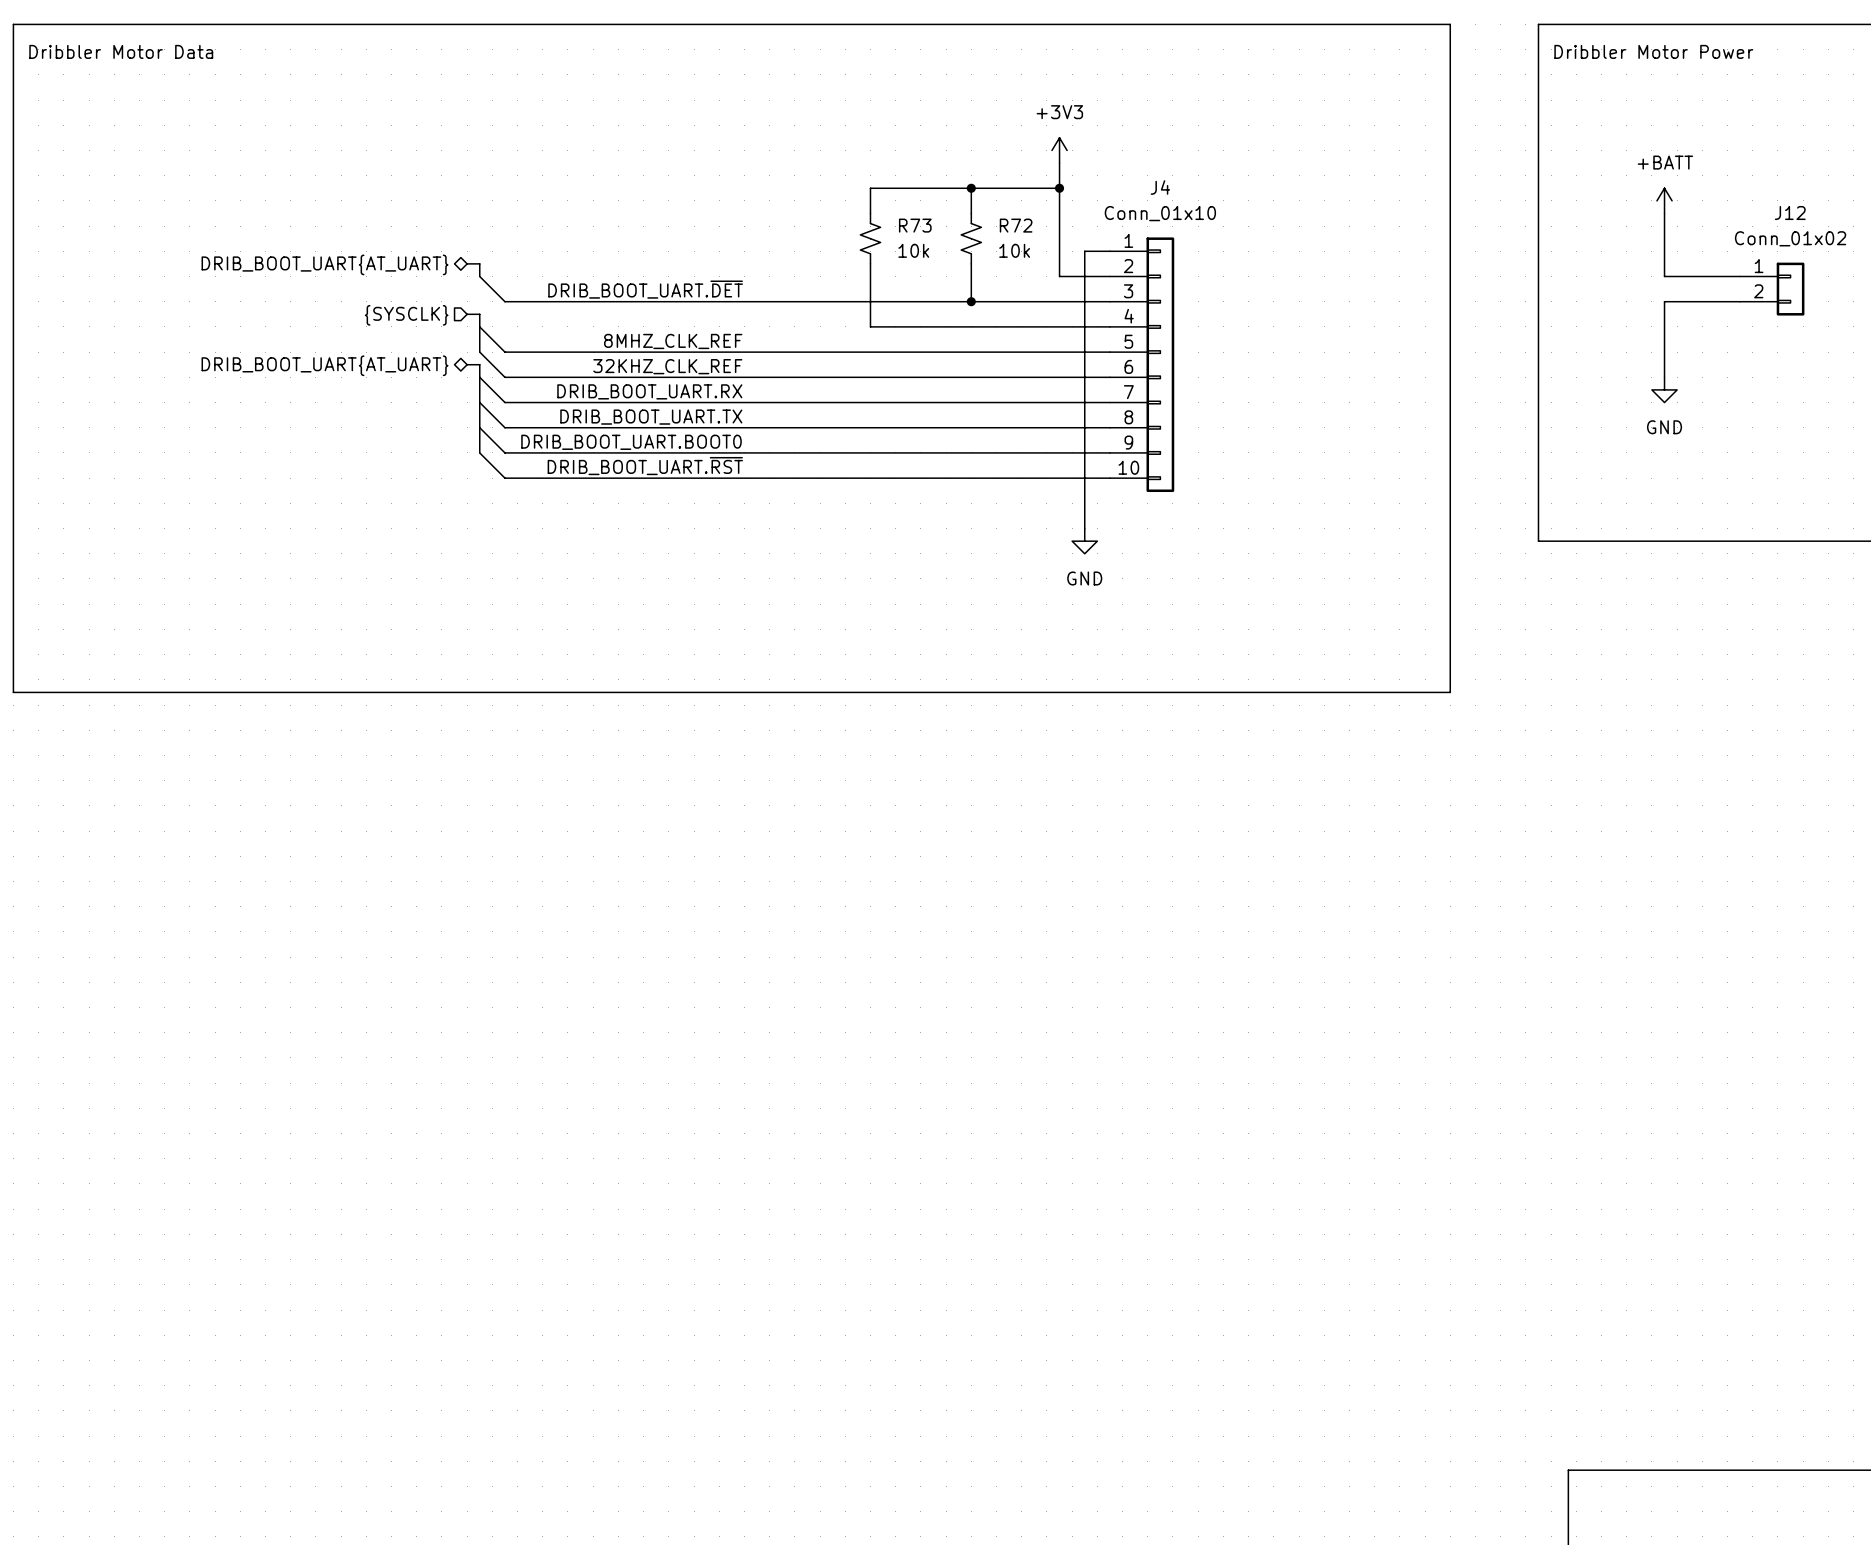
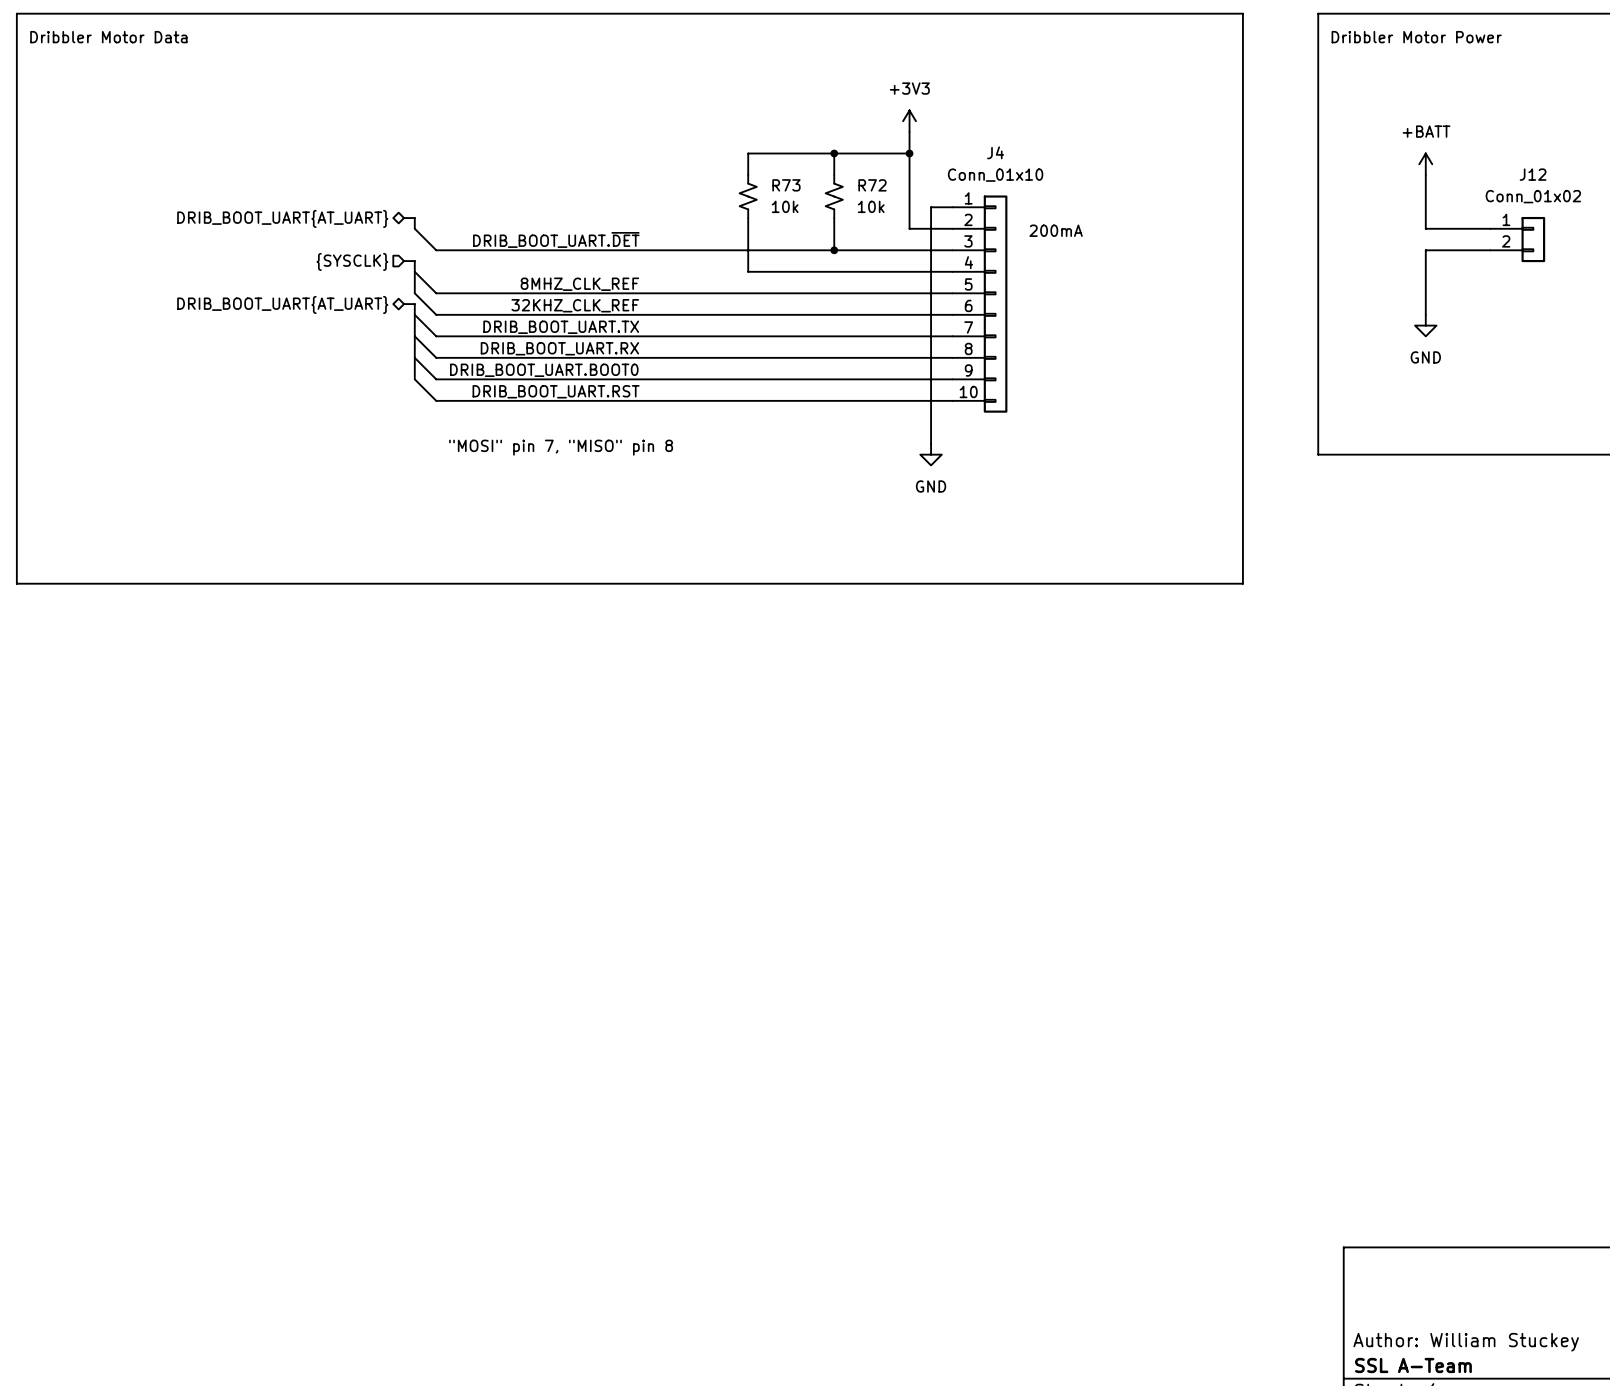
text: none -> 200mA (1056, 230)
label: DRIB_BOOT_UART.RX (649, 391) -> DRIB_BOOT_UART.TX (561, 327)
label: DRIB_BOOT_UART.TX (651, 417) -> DRIB_BOOT_UART.RX (559, 348)
label: DRIB_BOOT_UART.~{RST} (645, 466) -> DRIB_BOOT_UART.RST (556, 391)
text: none -> "MOSI" pin 7, "MISO" pin 8 (561, 447)

